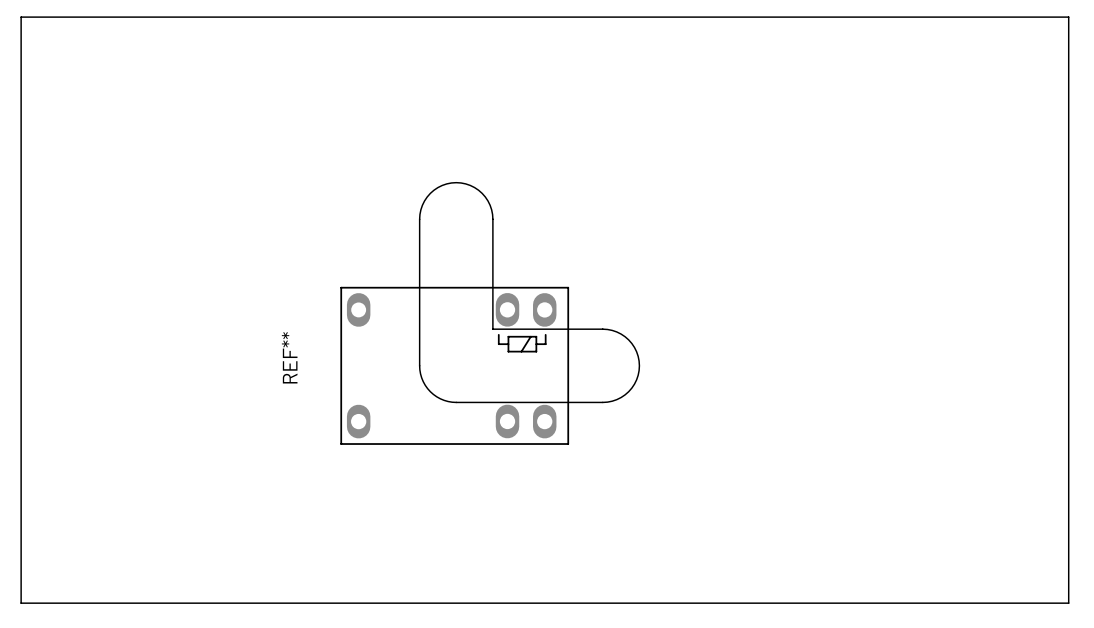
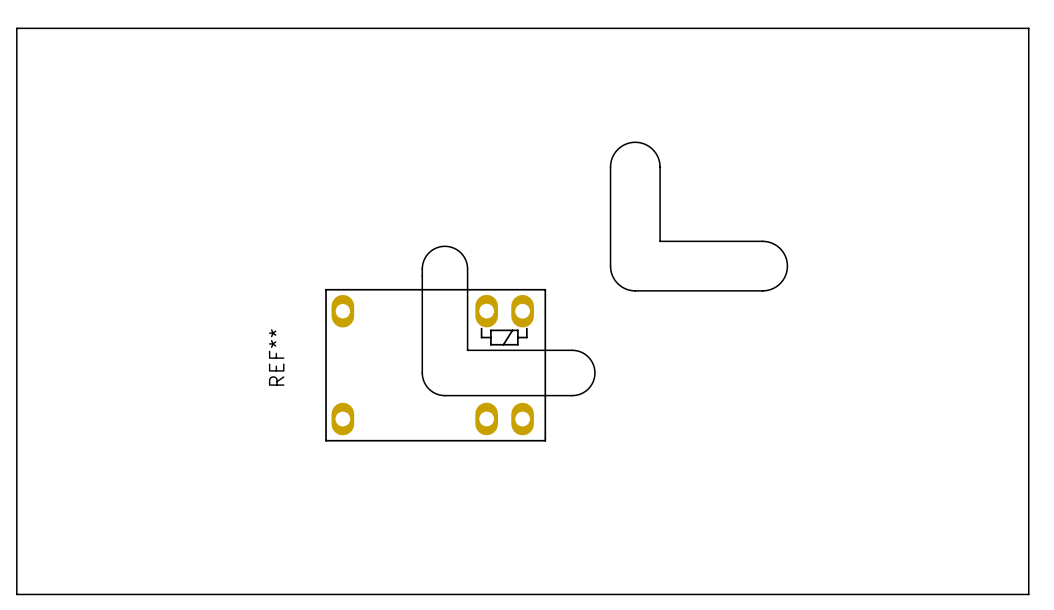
board edge: none -> (610, 167) (610, 268) (614, 279) (622, 287) (635, 290) (762, 290) (774, 288) (783, 280) (786, 272) (786, 260) (781, 249) (771, 242) (660, 241) (659, 164) (655, 152) (649, 146) (635, 142) (623, 145) (614, 152) (610, 167)
board edge: (419, 219) (419, 369) (423, 381) (433, 394) (444, 400) (456, 402) (602, 402) (616, 399) (631, 388) (639, 370) (638, 356) (631, 343) (616, 331) (602, 329) (492, 329) (492, 214) (487, 200) (478, 190) (465, 183) (456, 182) (437, 187) (424, 200) (419, 219) -> (422, 268) (422, 375) (425, 385) (432, 392) (444, 395) (572, 395) (580, 393) (590, 386) (594, 375) (593, 364) (588, 356) (578, 351) (467, 350) (467, 268) (464, 257) (453, 248) (439, 247) (426, 255) (422, 268)
REF** footprint: [340, 286, 570, 445] -> [325, 288, 547, 442]

